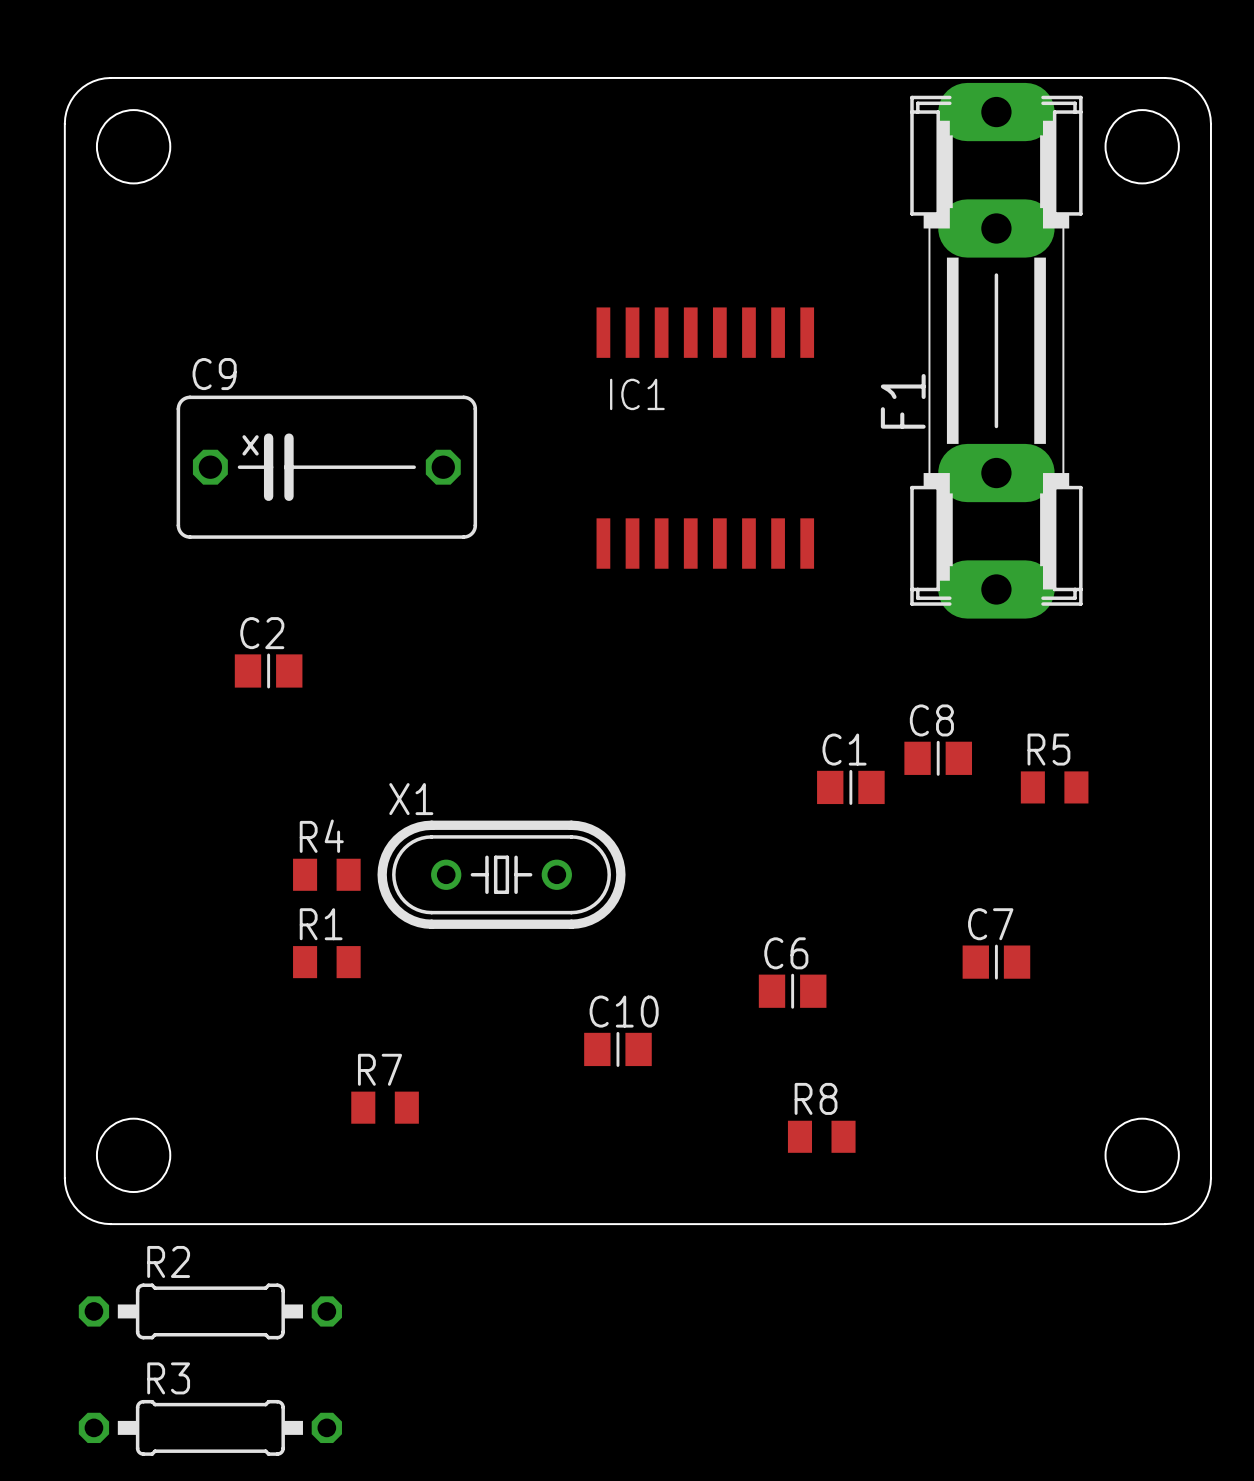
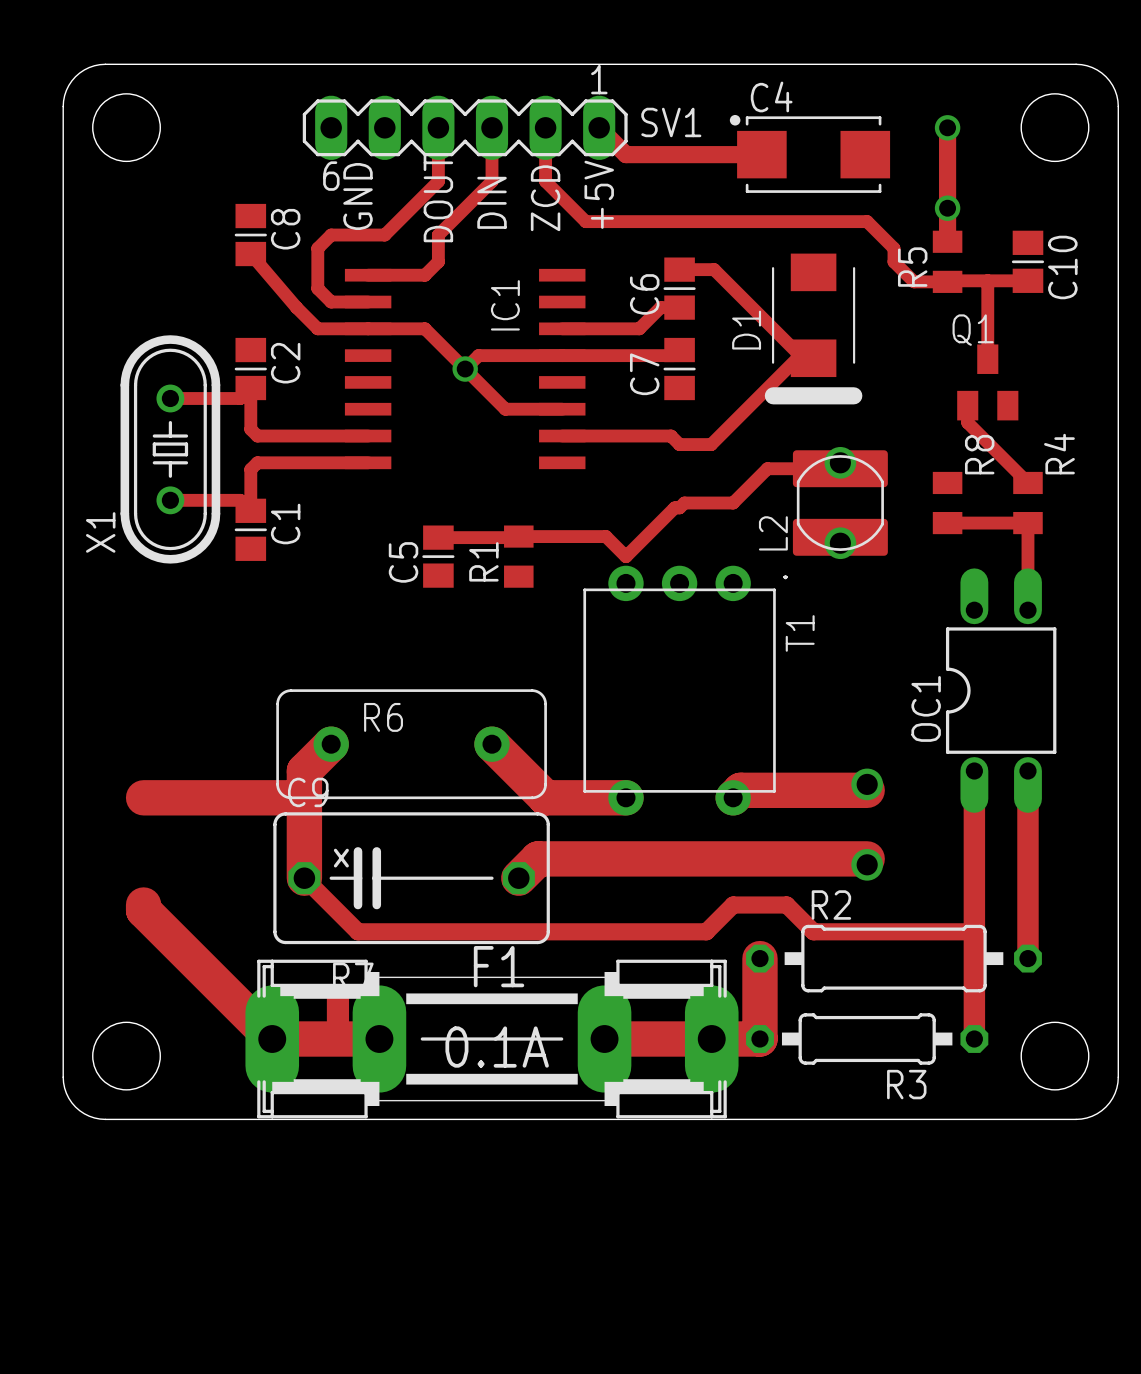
track: none -> (438, 127) (438, 181) (384, 235) (331, 235) (317, 248) (317, 288) (331, 302) (368, 302)
SV1: none -> (465, 127)
track: none -> (491, 127) (491, 181) (438, 235) (438, 261) (424, 275) (368, 275)
track: none -> (545, 127) (545, 181) (585, 221) (867, 221) (893, 248) (893, 261) (914, 281) (1027, 280)
track: none -> (599, 127) (625, 154) (761, 154)
track: none -> (947, 127) (947, 241)
via: none -> (947, 127)
C4: none -> (809, 153)
text: none -> +5V (599, 194)
text: none -> GND (358, 196)
text: none -> DOUT (438, 198)
text: none -> ZCD (545, 198)
text: none -> DIN (491, 202)
via: none -> (947, 208)
track: none -> (250, 254) (296, 307) (317, 328) (424, 328) (505, 409) (562, 409)
track: none -> (679, 269) (714, 269) (802, 358)
track: none -> (987, 280) (987, 359)
track: none -> (679, 307) (660, 307) (639, 328) (562, 328)
D1: none -> (813, 315)
F1 rotation: 0° (996, 350) -> 90° clockwise (491, 1039)
F1 position: (996, 350) -> (491, 1039)
track: none -> (679, 350) (673, 355) (478, 355) (465, 369)
track: none -> (813, 358) (797, 358) (711, 444) (679, 444) (671, 436) (562, 436)
F1 name position: F1 (903, 401) -> F1 (499, 966)
via: none -> (465, 369)
Q1: none -> (987, 382)
IC1 rotation: 0° (705, 438) -> 90° clockwise (465, 369)
IC1 position: (705, 438) -> (465, 369)
line: none -> (773, 395) (853, 395)
track: none -> (170, 398) (240, 398) (250, 388) (250, 429) (257, 436) (368, 436)
track: none -> (967, 405) (967, 422) (1027, 482)
C9 position: (326, 467) -> (411, 878)
track: none -> (368, 462) (257, 462) (250, 469) (250, 510) (240, 500) (170, 500)
via: none -> (840, 462)
track: none -> (840, 468) (767, 468) (733, 503) (684, 503) (679, 507) (674, 507) (625, 556) (605, 536) (438, 537)
L2: none -> (840, 503)
track: none -> (947, 523) (1027, 523) (1027, 610)
via: none -> (840, 543)
C5: none -> (438, 556)
C2 rotation: 0° (268, 670) -> 90° clockwise (250, 369)
C2 position: (268, 670) -> (250, 369)
R5 name position: R5 (1048, 749) -> R5 (912, 267)
T1: none -> (679, 690)
C8 rotation: 0° (938, 758) -> 90° clockwise (250, 235)
C8 position: (938, 758) -> (250, 235)
OC1: none -> (1001, 690)
C1 rotation: 0° (850, 787) -> 90° clockwise (250, 529)
C1 position: (850, 787) -> (250, 529)
R5 rotation: 0° (1054, 787) -> 90° clockwise (947, 261)
R5 position: (1054, 787) -> (947, 261)
X1 name position: X1 (411, 799) -> X1 (100, 532)
track: none -> (331, 744) (304, 771) (304, 878) (358, 931) (706, 931) (733, 905) (786, 905) (813, 931) (974, 931)
R6: none -> (411, 744)
track: none -> (491, 744) (545, 797) (625, 797)
track: none -> (974, 771) (974, 1039)
track: none -> (1027, 771) (1027, 958)
via: none -> (867, 784)
track: none -> (867, 790) (740, 790) (733, 797)
track: none -> (143, 797) (304, 797)
R4 rotation: 0° (326, 874) -> 90° clockwise (1027, 503)
R4 position: (326, 874) -> (1027, 503)
X1 rotation: 0° (501, 874) -> 90° clockwise (170, 449)
X1 position: (501, 874) -> (170, 449)
R1 name position: R1 (321, 924) -> R1 (483, 561)
C7 name position: C7 (990, 924) -> C7 (644, 374)
track: none -> (867, 858) (538, 858) (518, 878)
via: none -> (867, 864)
C6 name position: C6 (786, 953) -> C6 (644, 294)
R1 rotation: 0° (326, 962) -> 90° clockwise (518, 556)
R1 position: (326, 962) -> (518, 556)
C7 rotation: 0° (996, 962) -> 90° clockwise (679, 369)
C7 position: (996, 962) -> (679, 369)
track: none -> (143, 905) (143, 910) (272, 1039) (379, 1039)
C6 rotation: 0° (792, 991) -> 90° clockwise (679, 288)
C6 position: (792, 991) -> (679, 288)
C10 rotation: 0° (617, 1049) -> 90° clockwise (1027, 261)
C10 position: (617, 1049) -> (1027, 261)
track: none -> (759, 958) (759, 1039) (604, 1039)
R8 rotation: 0° (821, 1136) -> 90° clockwise (947, 503)
R8 position: (821, 1136) -> (947, 503)
F1 value: none -> 0.1A (497, 1047)
R2 footprint: [78, 1283, 342, 1340] -> [746, 924, 1042, 993]
R3 name position: R3 (168, 1378) -> R3 (906, 1084)
R3 position: (210, 1427) -> (867, 1039)

